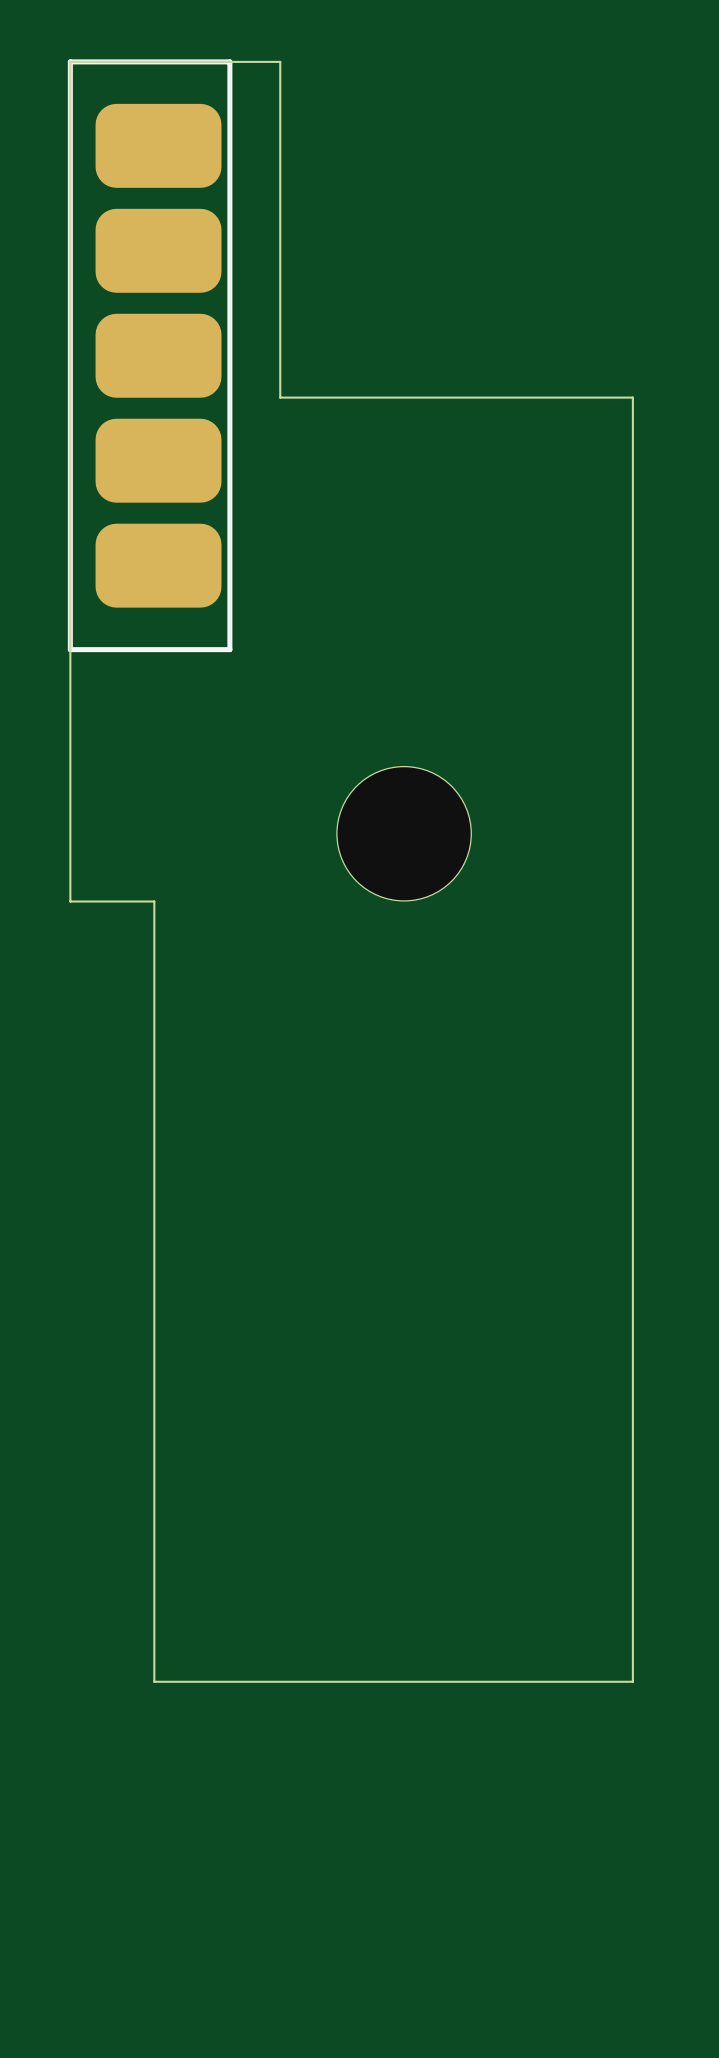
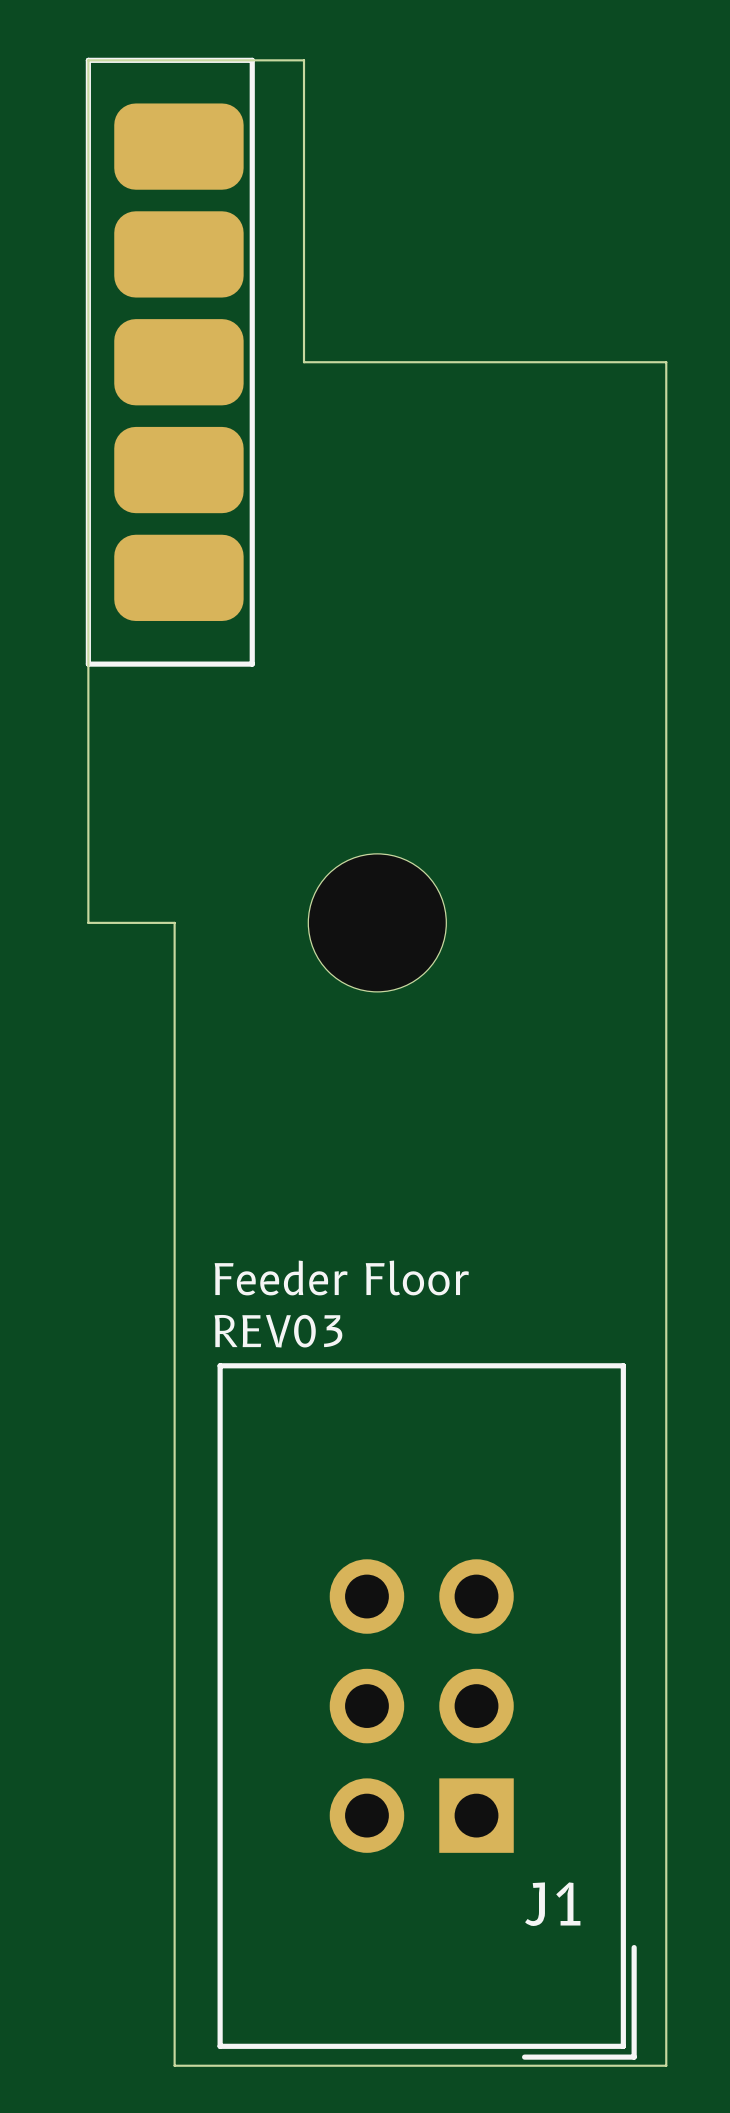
board edge: (280, 355) (280, 397) (632, 397) -> (304, 362) (666, 362) (666, 405)
part position: (404, 833) -> (377, 922)
text: none -> Feeder Floor (341, 1277)
text: none -> REV03 (278, 1331)
J1: none -> (427, 1711)
board edge: (632, 1681) (154, 1681) -> (666, 1724) (666, 2065) (174, 2065) (174, 1724)

